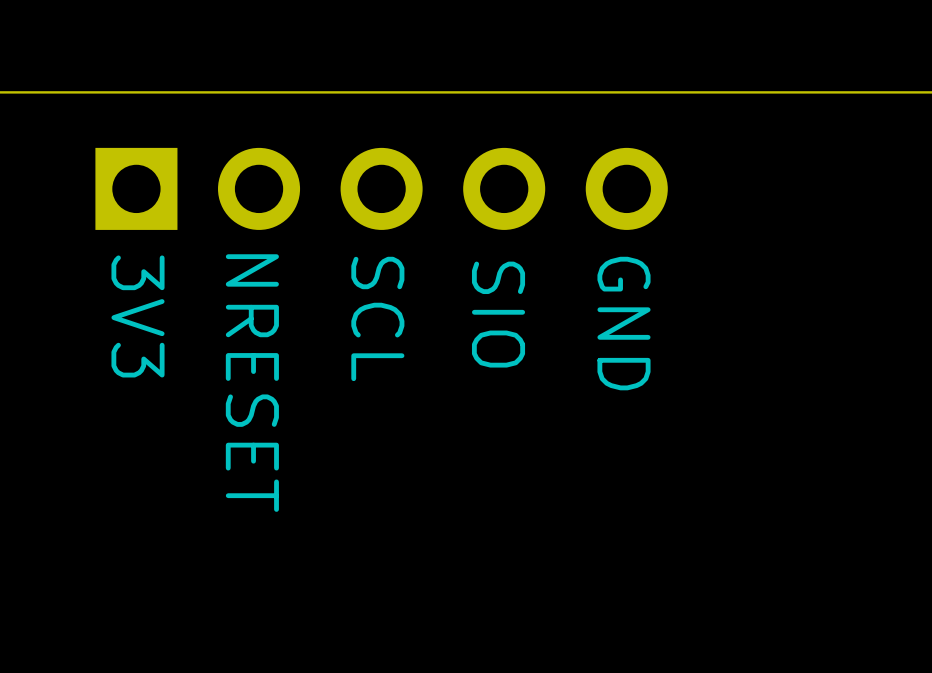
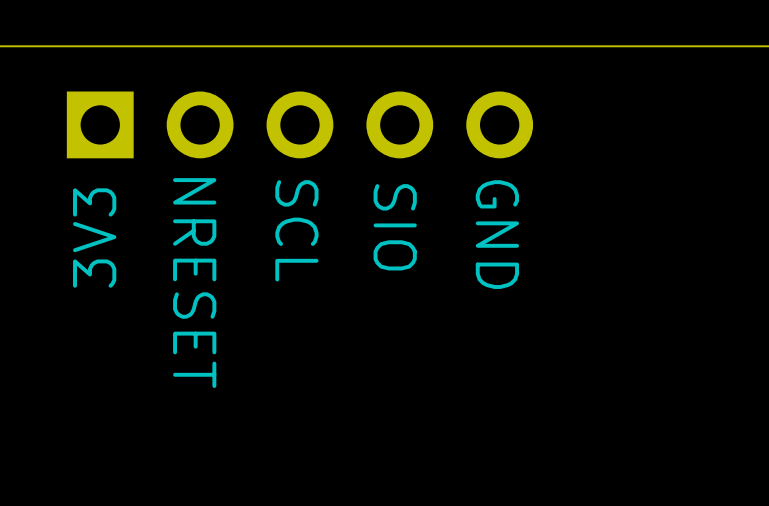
text rotation: 0° (138, 316) -> 180° (94, 238)

